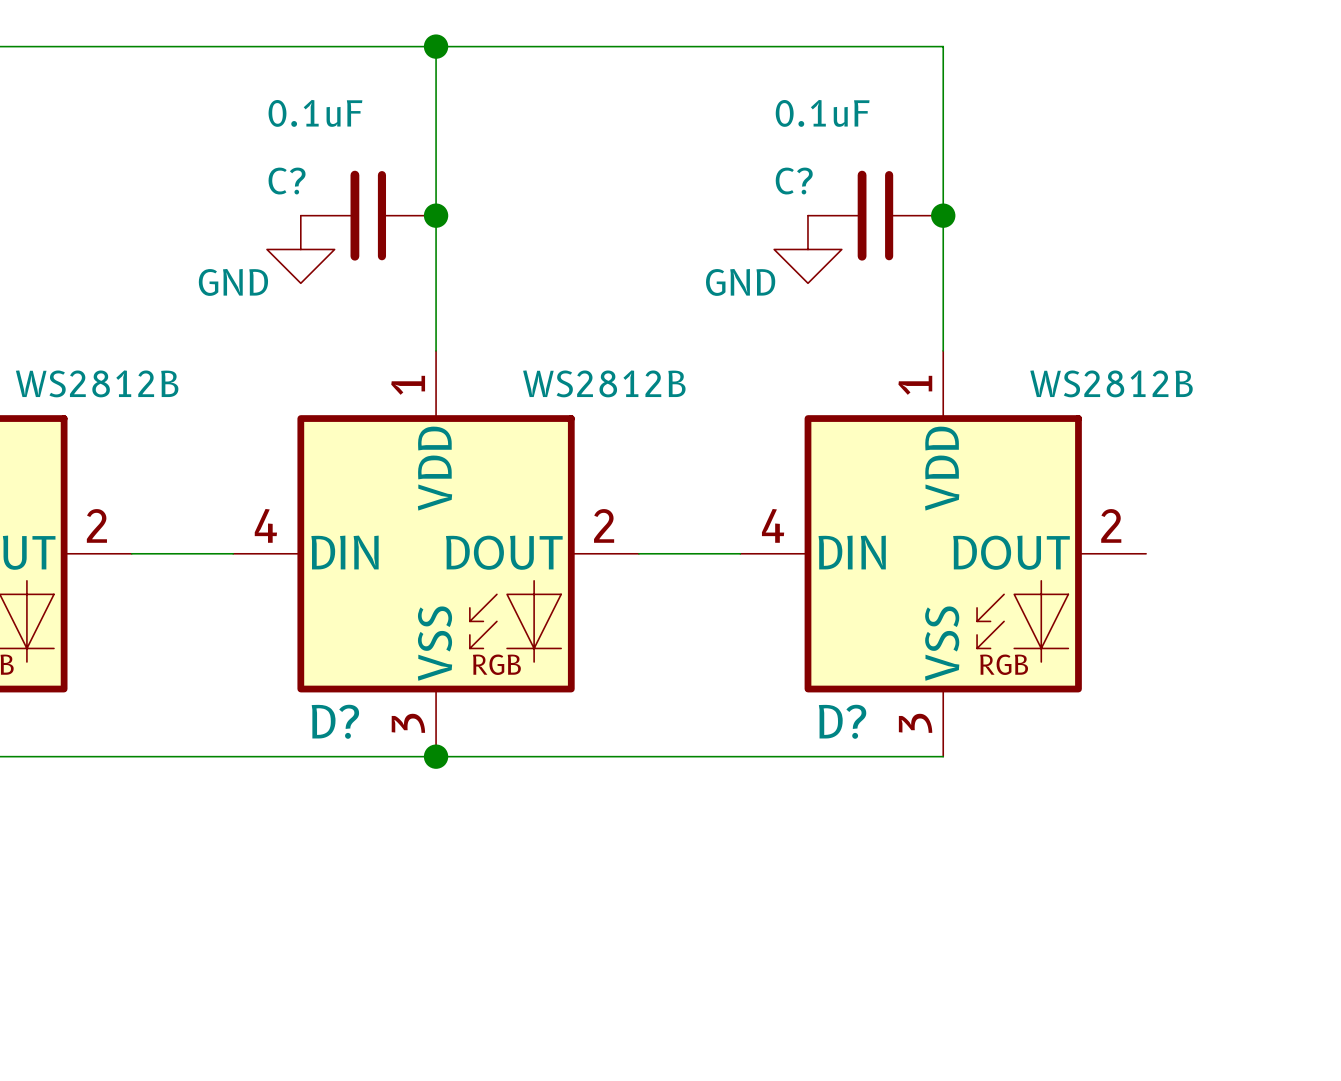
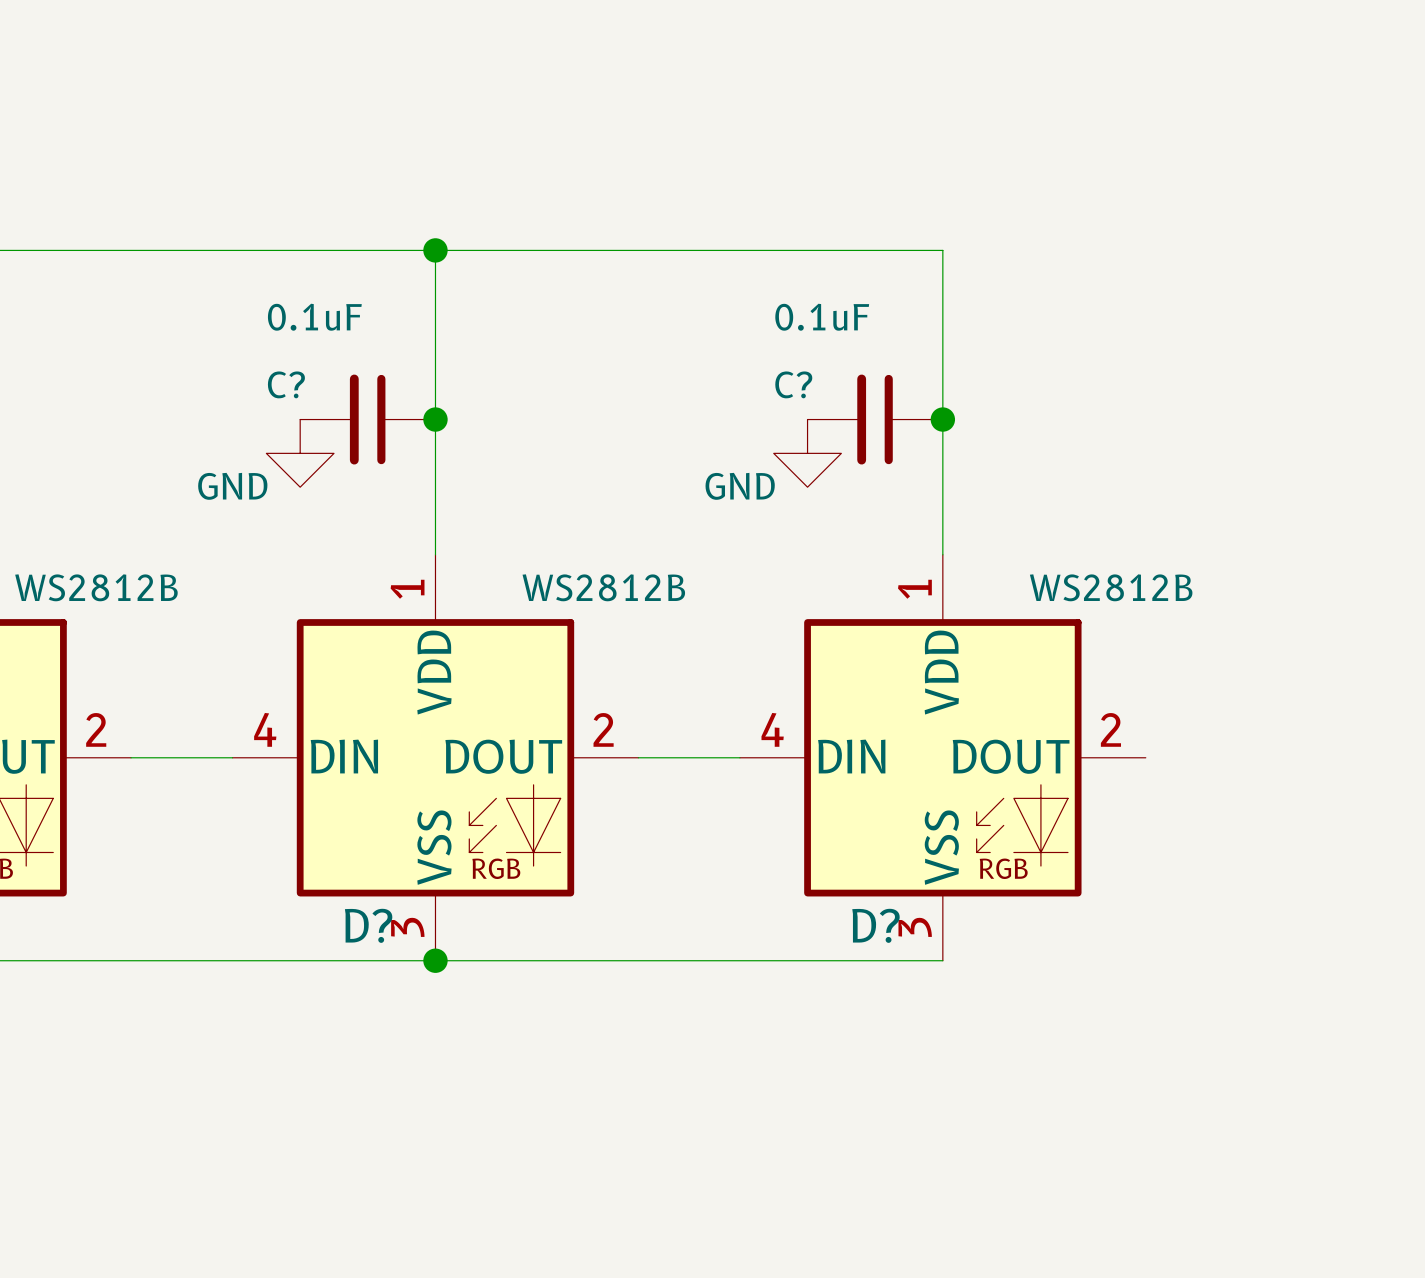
D? name position: D? (335, 721) -> D? (368, 925)
D? name position: D? (842, 721) -> D? (875, 925)

